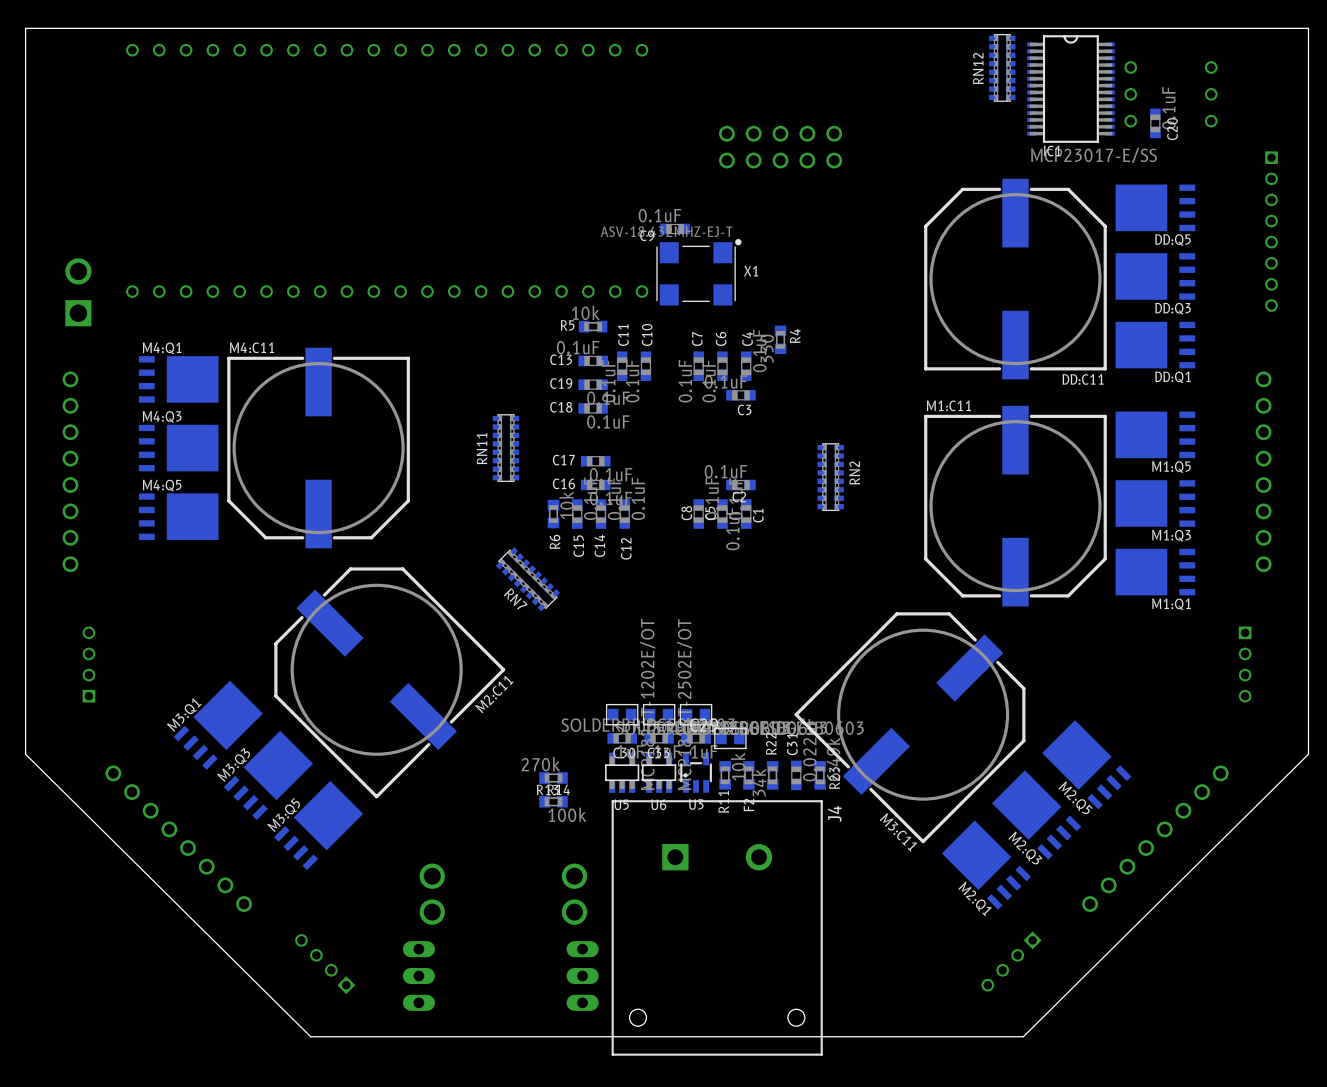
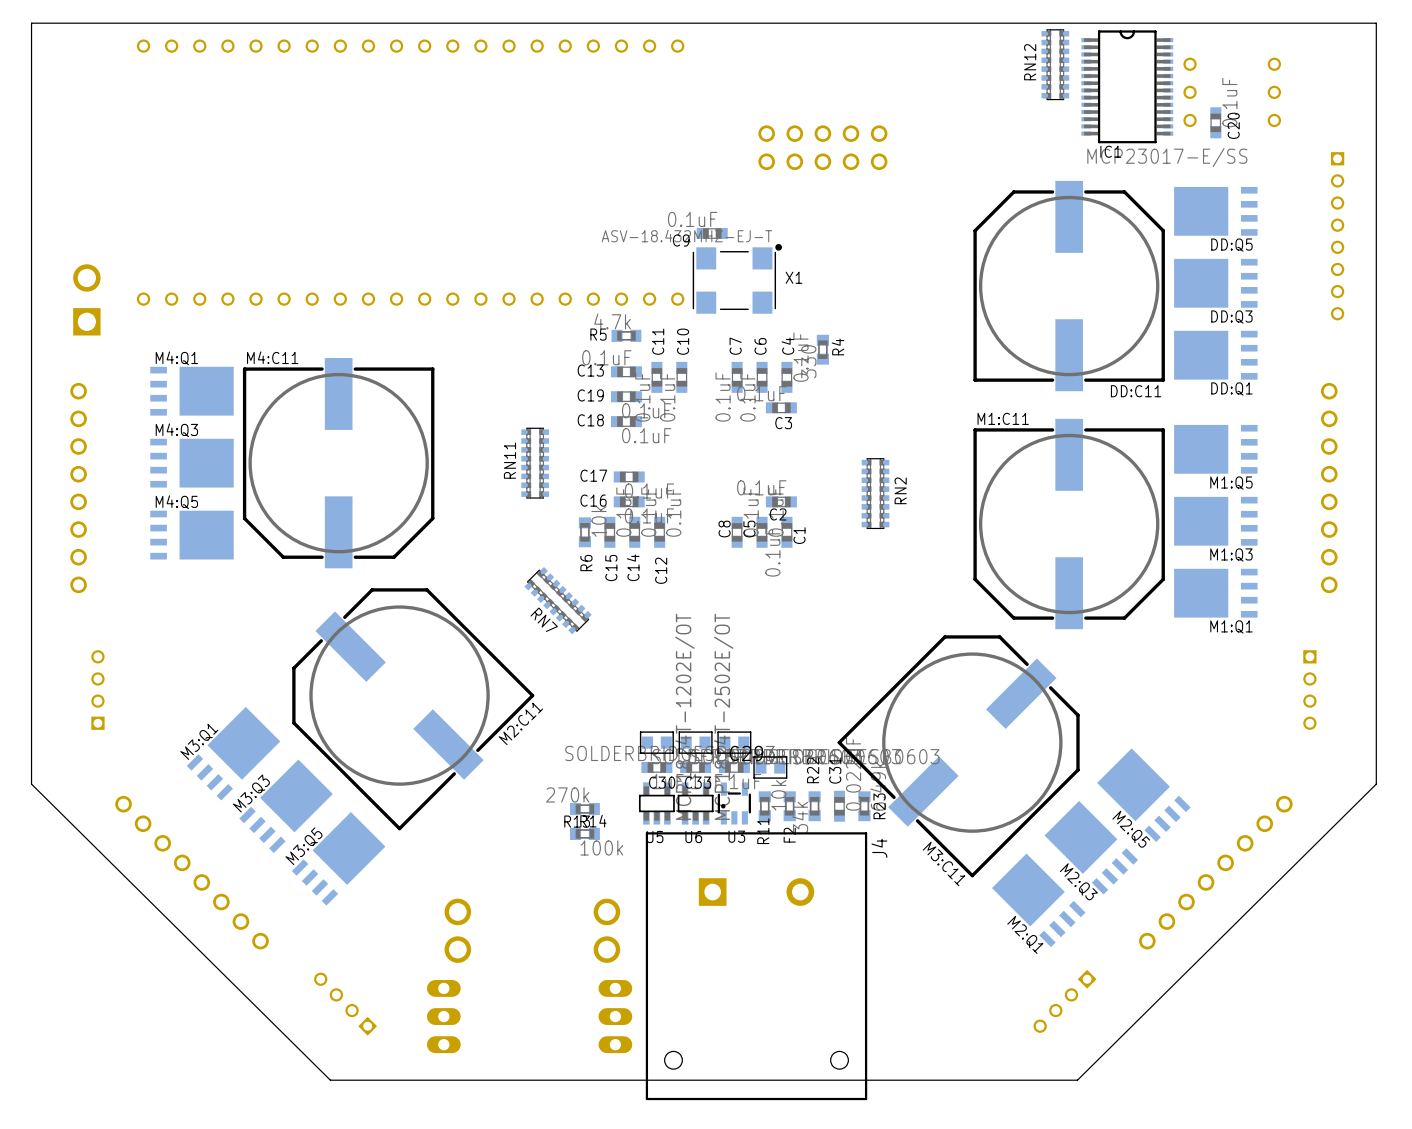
R5 value: 10k (585, 312) -> 4.7k (612, 321)

